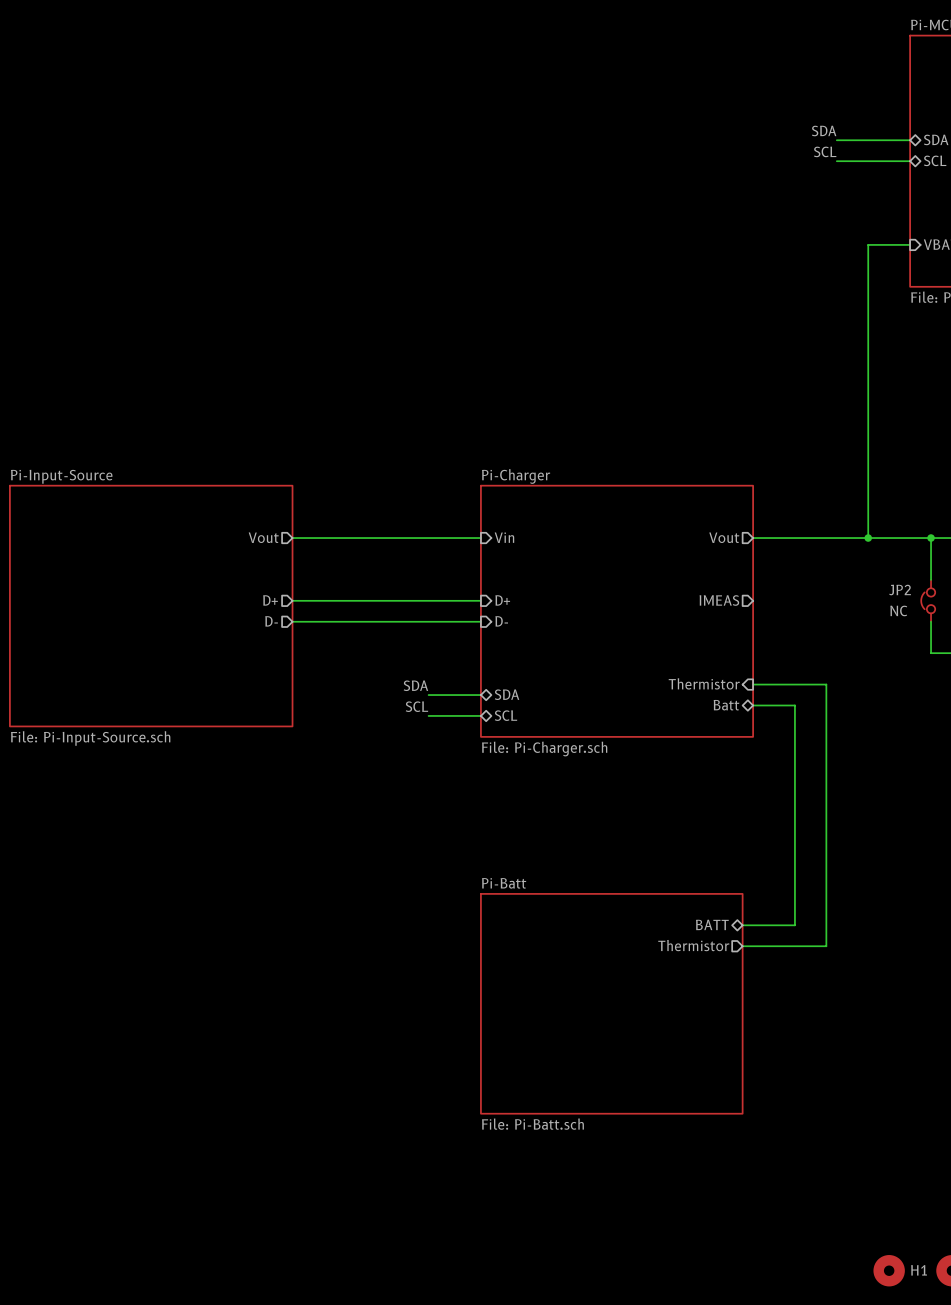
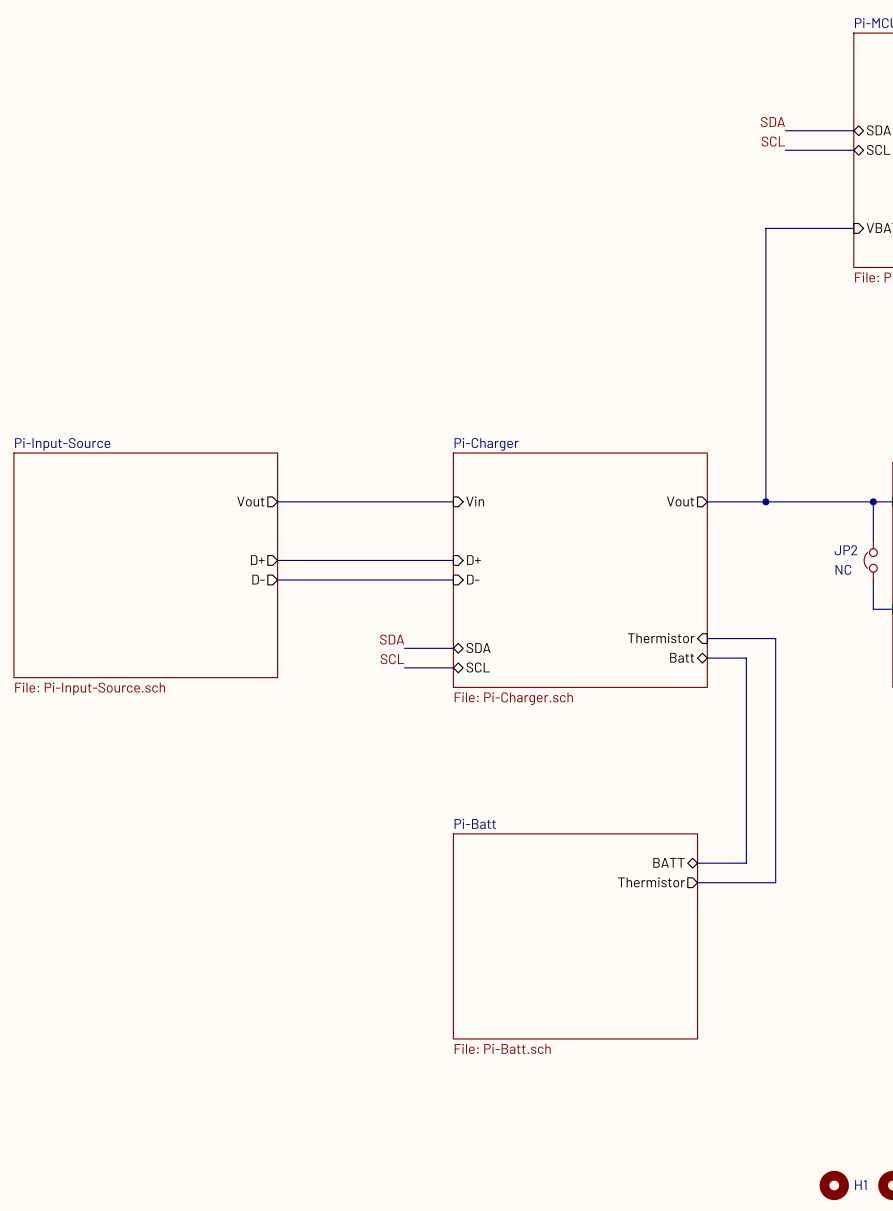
wire: (868, 244) (868, 538) -> (814, 228) (765, 228) (765, 501)
junction: none -> (765, 501)
junction: (868, 538) -> none
sheet pin: IMEAS (719, 600) -> none

